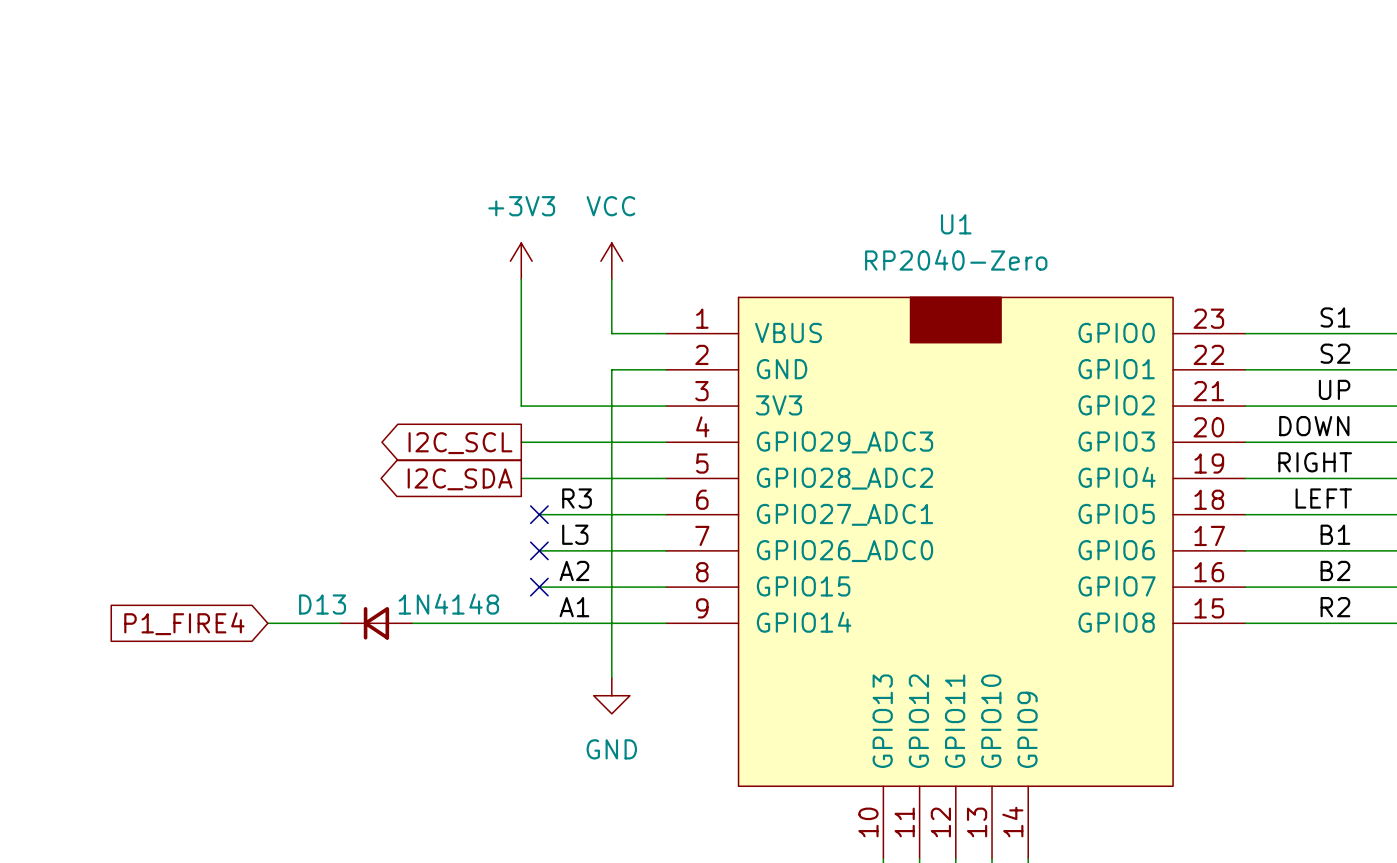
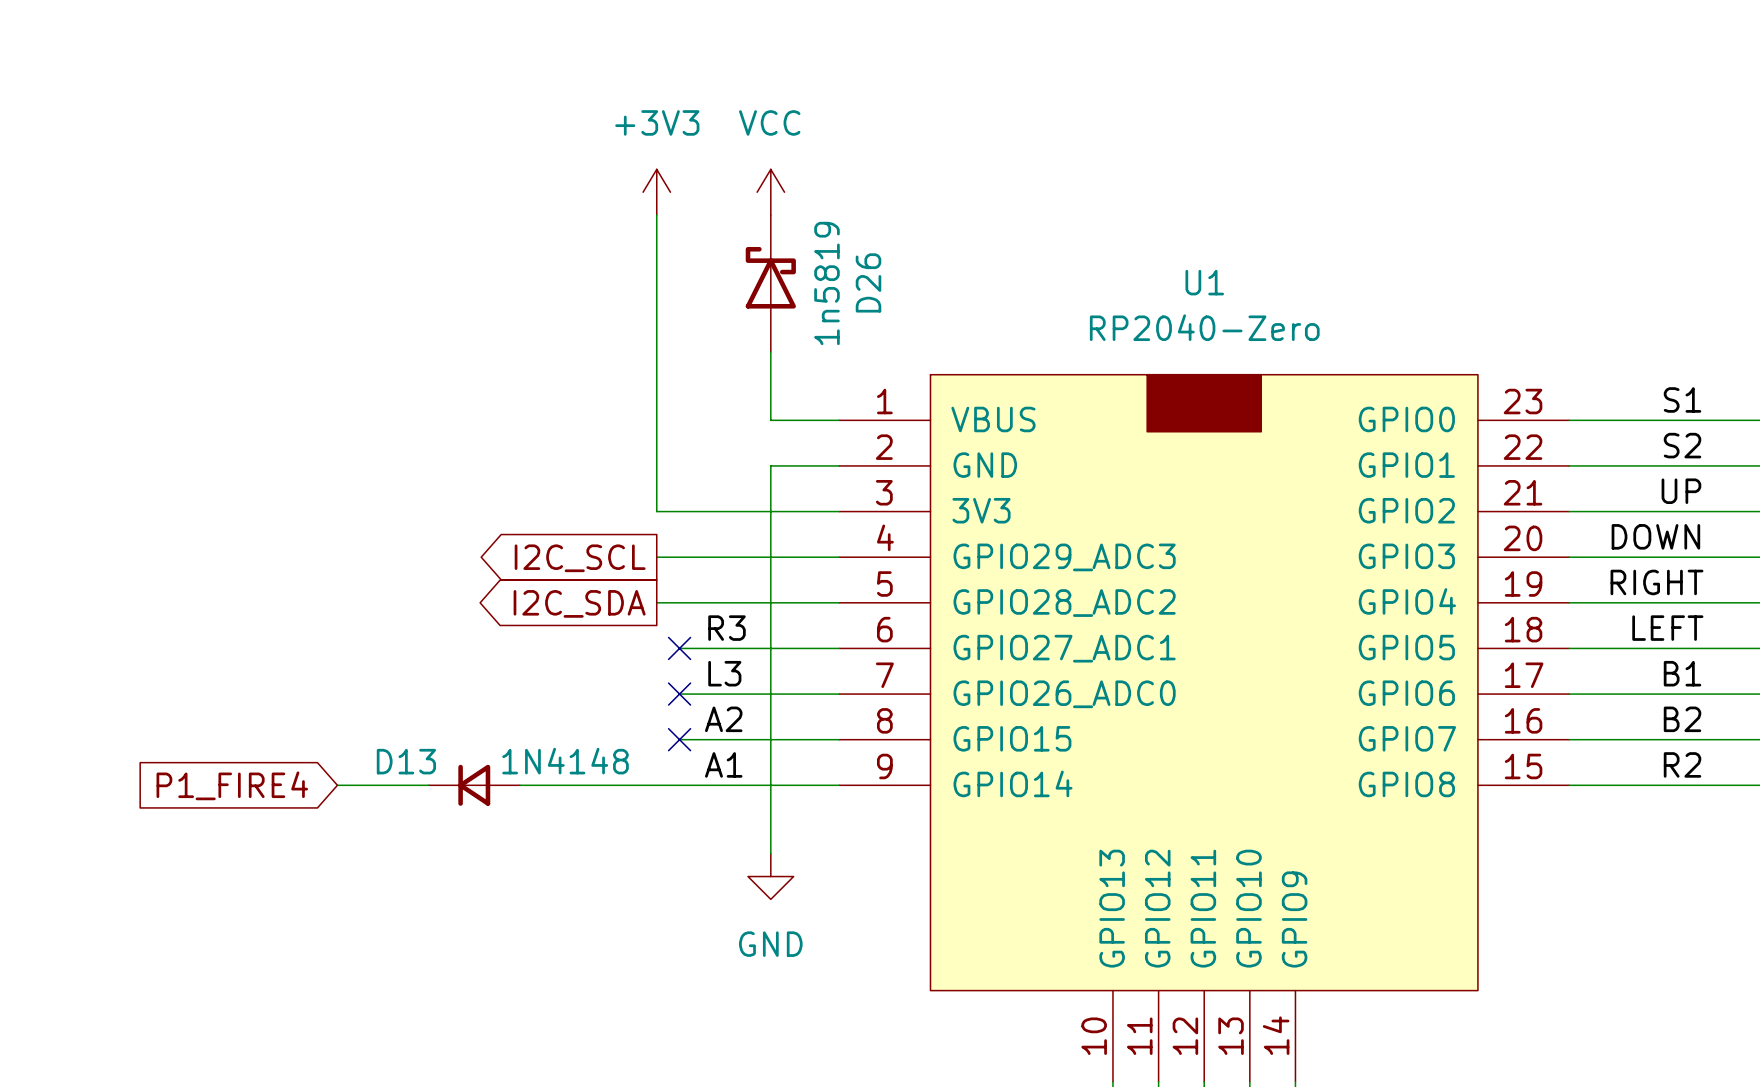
wire: none -> (656, 215) (656, 351)
D26: none -> 1n5819 (770, 283)
power symbol position: +3V3 (521, 261) -> +3V3 (656, 192)
power symbol position: VCC (611, 261) -> VCC (770, 192)

